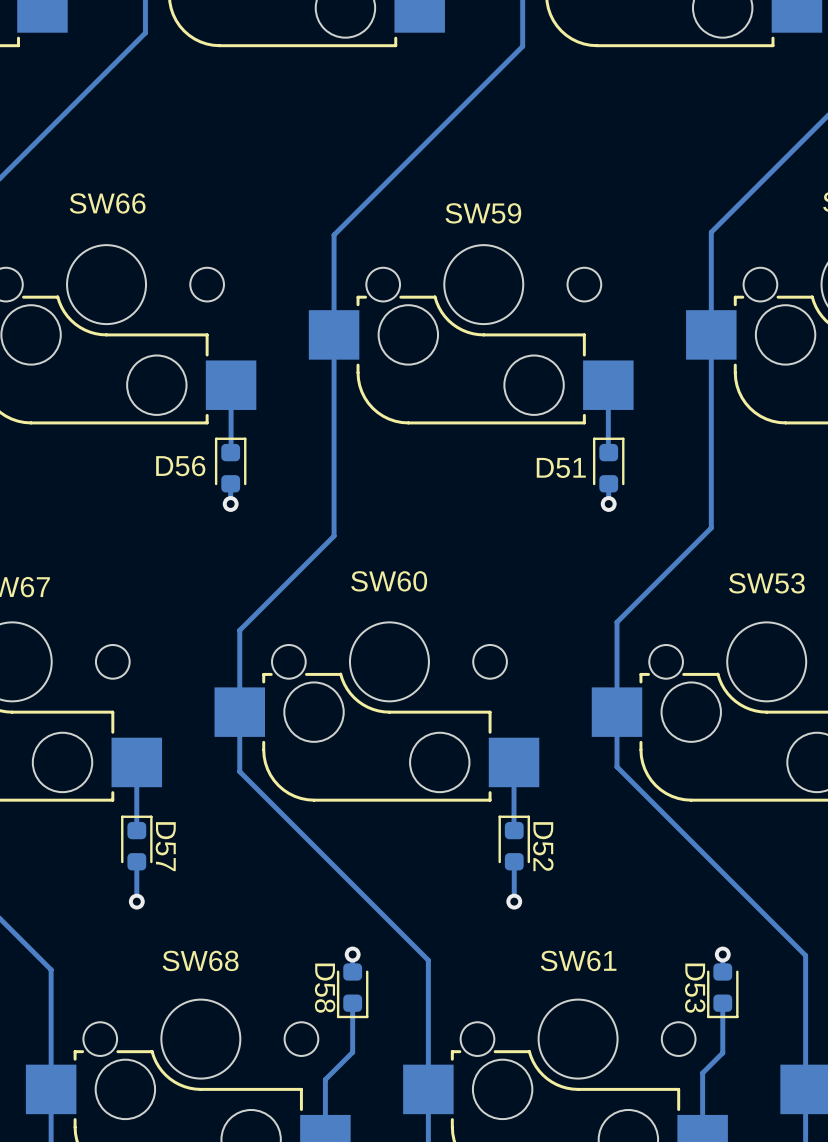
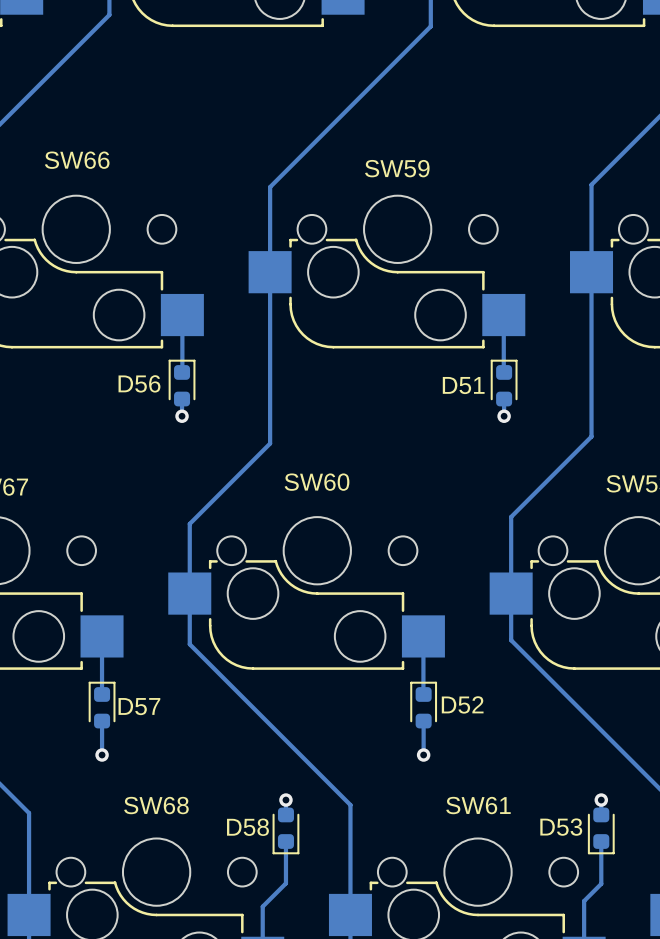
D57 name rotation: 0° (165, 846) -> 90° counterclockwise (139, 706)
D52 name rotation: 0° (543, 846) -> 90° counterclockwise (462, 704)
D58 name rotation: 0° (325, 988) -> 90° counterclockwise (247, 827)
D53 name rotation: 0° (695, 988) -> 90° counterclockwise (561, 827)

